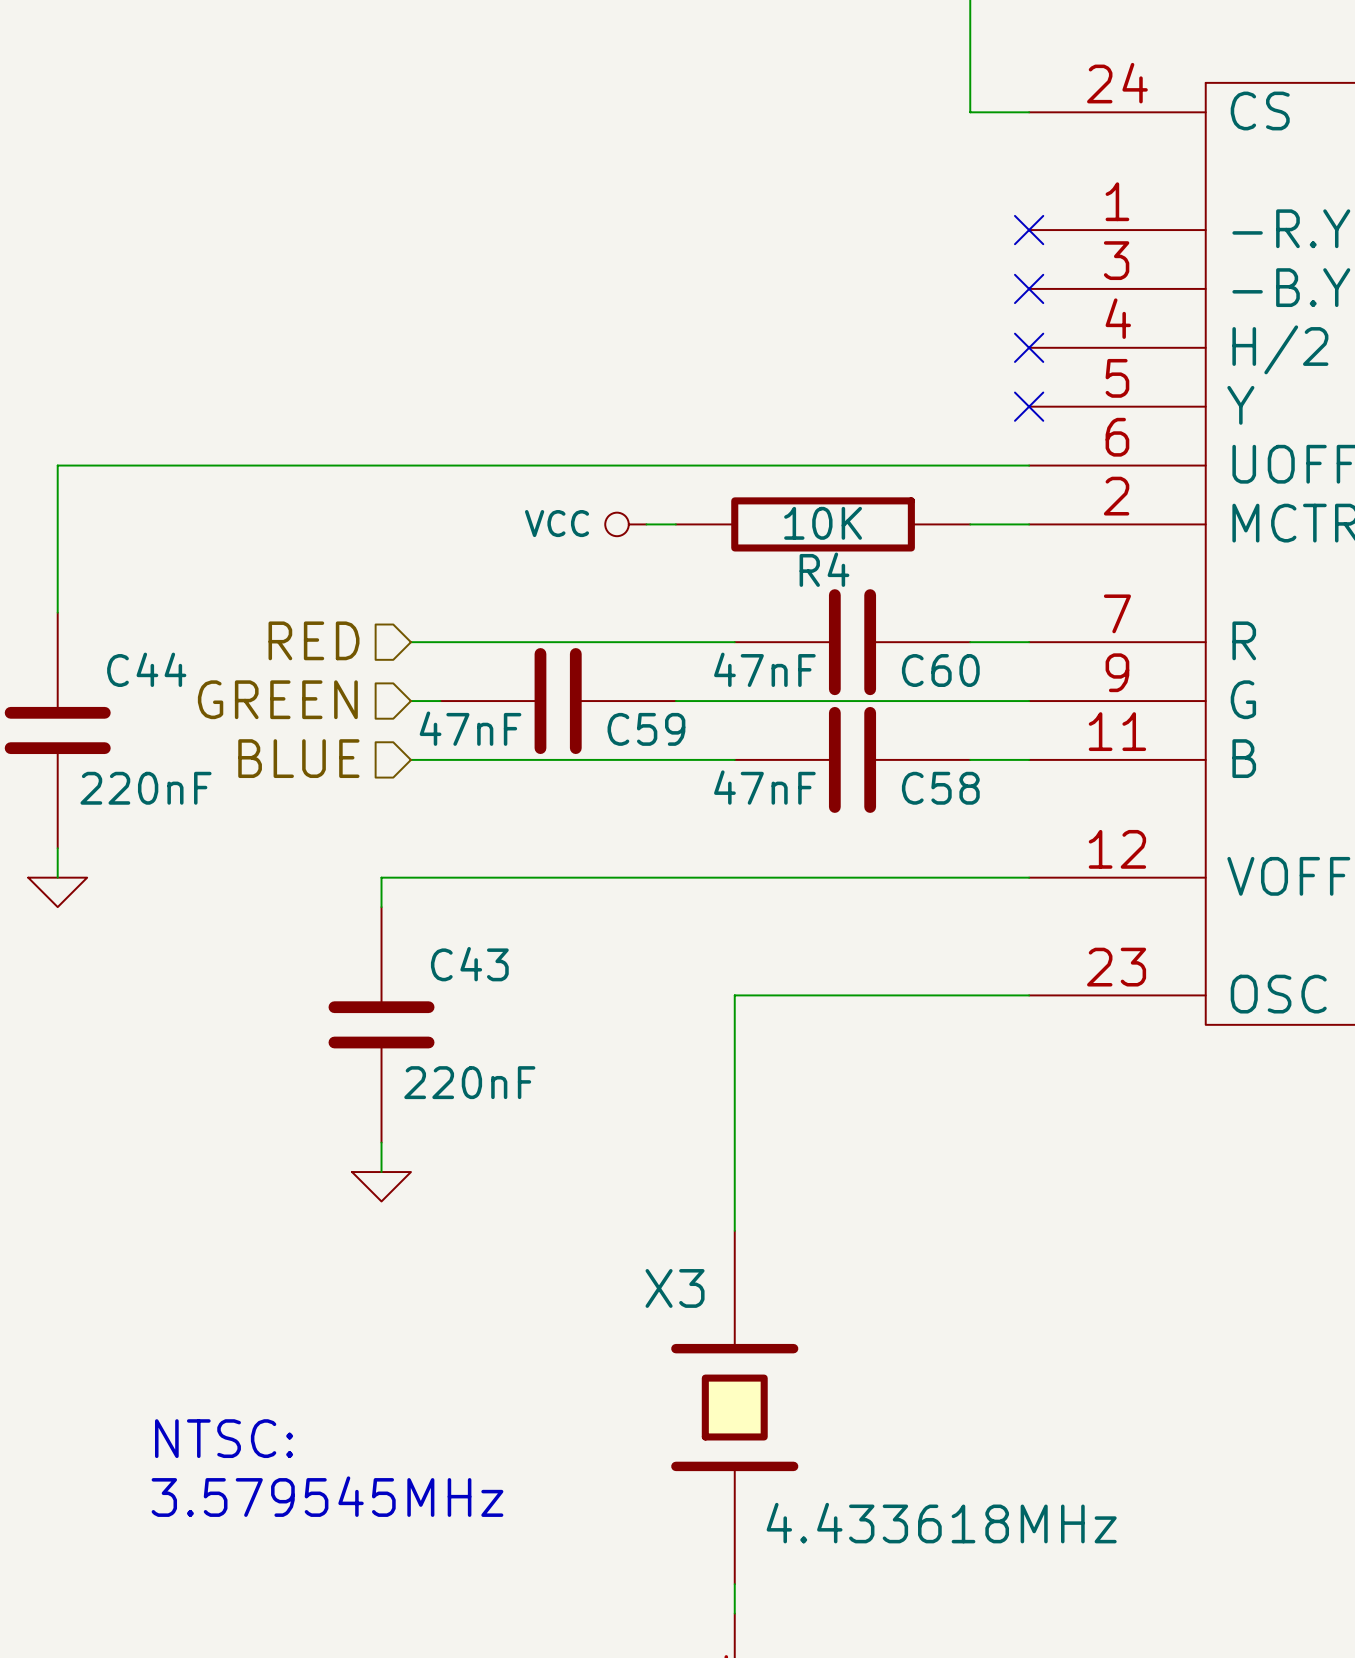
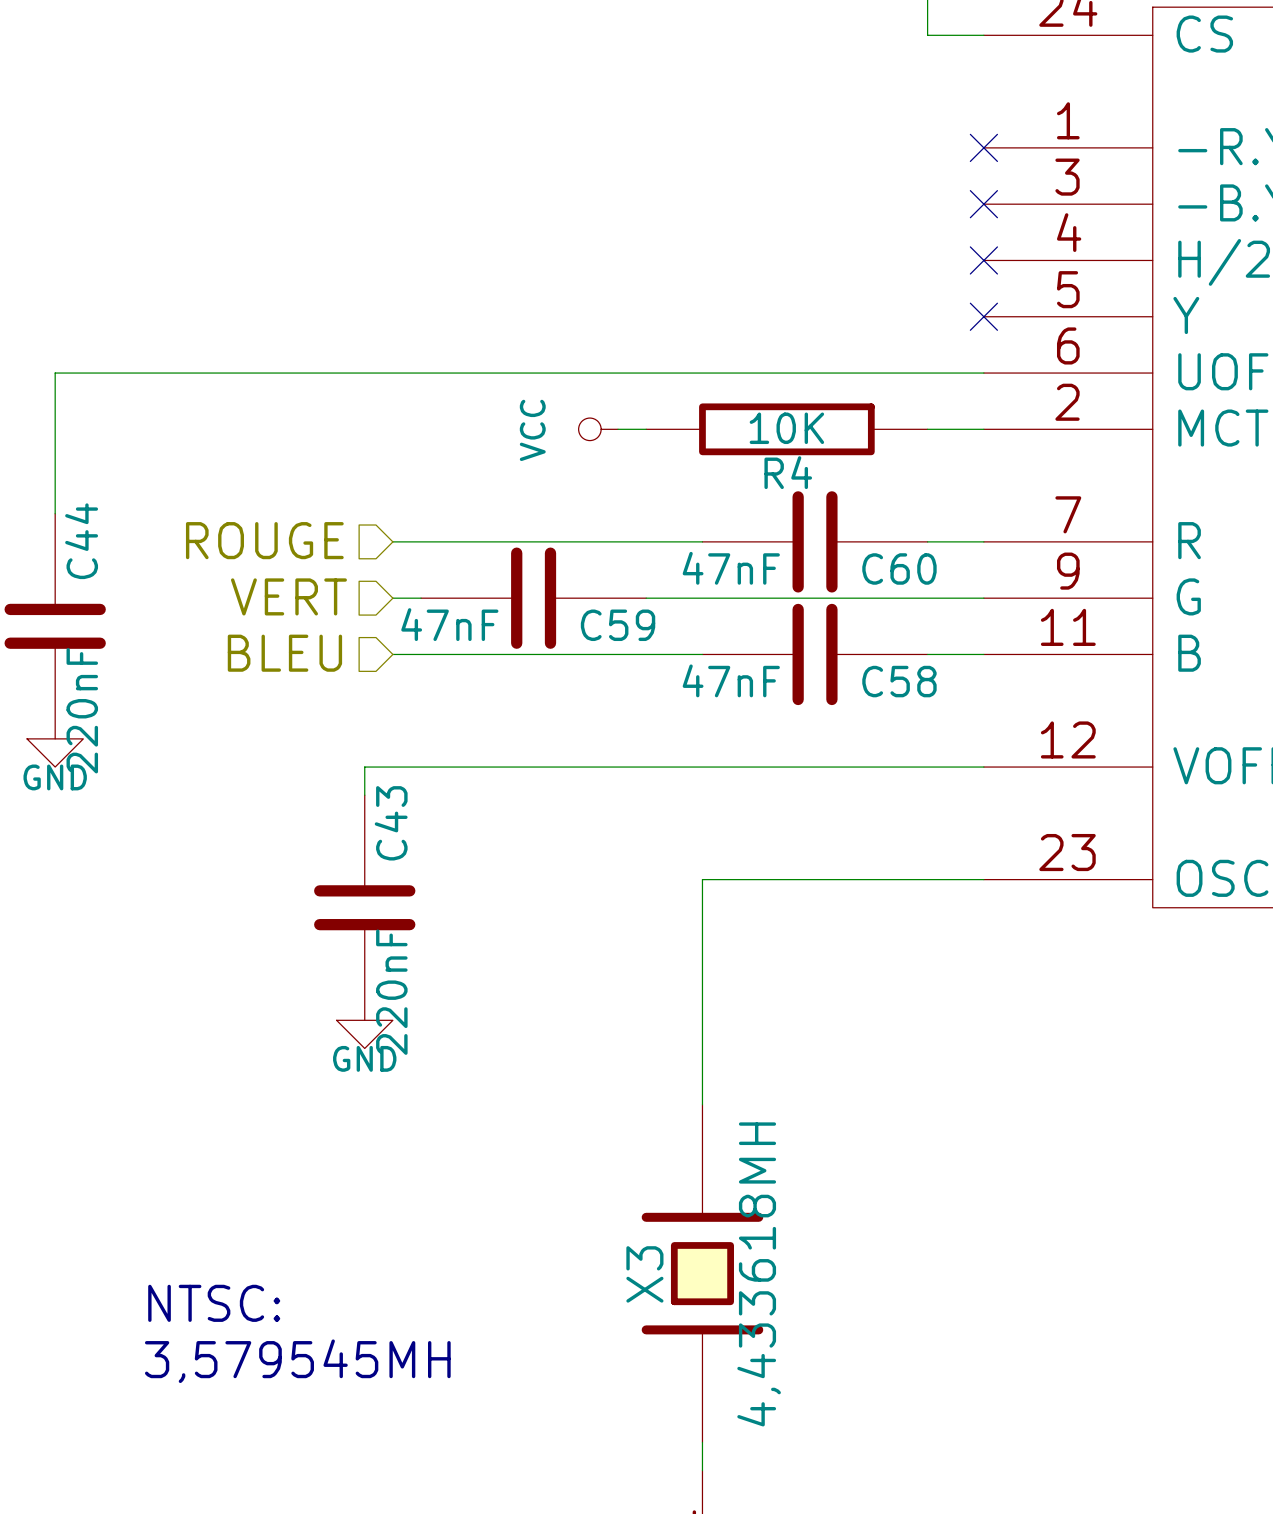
power symbol text rotation: 0° (557, 523) -> 90° counterclockwise (532, 430)
hierarchical label: RED (314, 640) -> ROUGE (264, 540)
C44 name rotation: 0° (146, 669) -> 90° counterclockwise (81, 541)
hierarchical label: GREEN (277, 699) -> VERT (288, 596)
hierarchical label: BLUE (298, 758) -> BLEU (284, 653)
C44 value rotation: 0° (146, 788) -> 90° counterclockwise (82, 710)
wire: (57, 848) (57, 877) -> none
power symbol: none -> GND (55, 752)
power symbol: (57, 892) -> none
C43 name rotation: 0° (469, 964) -> 90° counterclockwise (391, 823)
C43 value rotation: 0° (469, 1082) -> 90° counterclockwise (391, 992)
wire: (381, 1142) (381, 1172) -> none
power symbol: none -> GND (364, 1034)
power symbol: (381, 1186) -> none
X3 name rotation: 0° (675, 1288) -> 90° counterclockwise (644, 1274)
X3 name position: X3 (675, 1288) -> X3 (644, 1274)
text: 3.579545MHz (327, 1496) -> 3,579545MH (297, 1361)
X3 value: 4.433618MHz (941, 1523) -> 4,433618MH (759, 1274)

